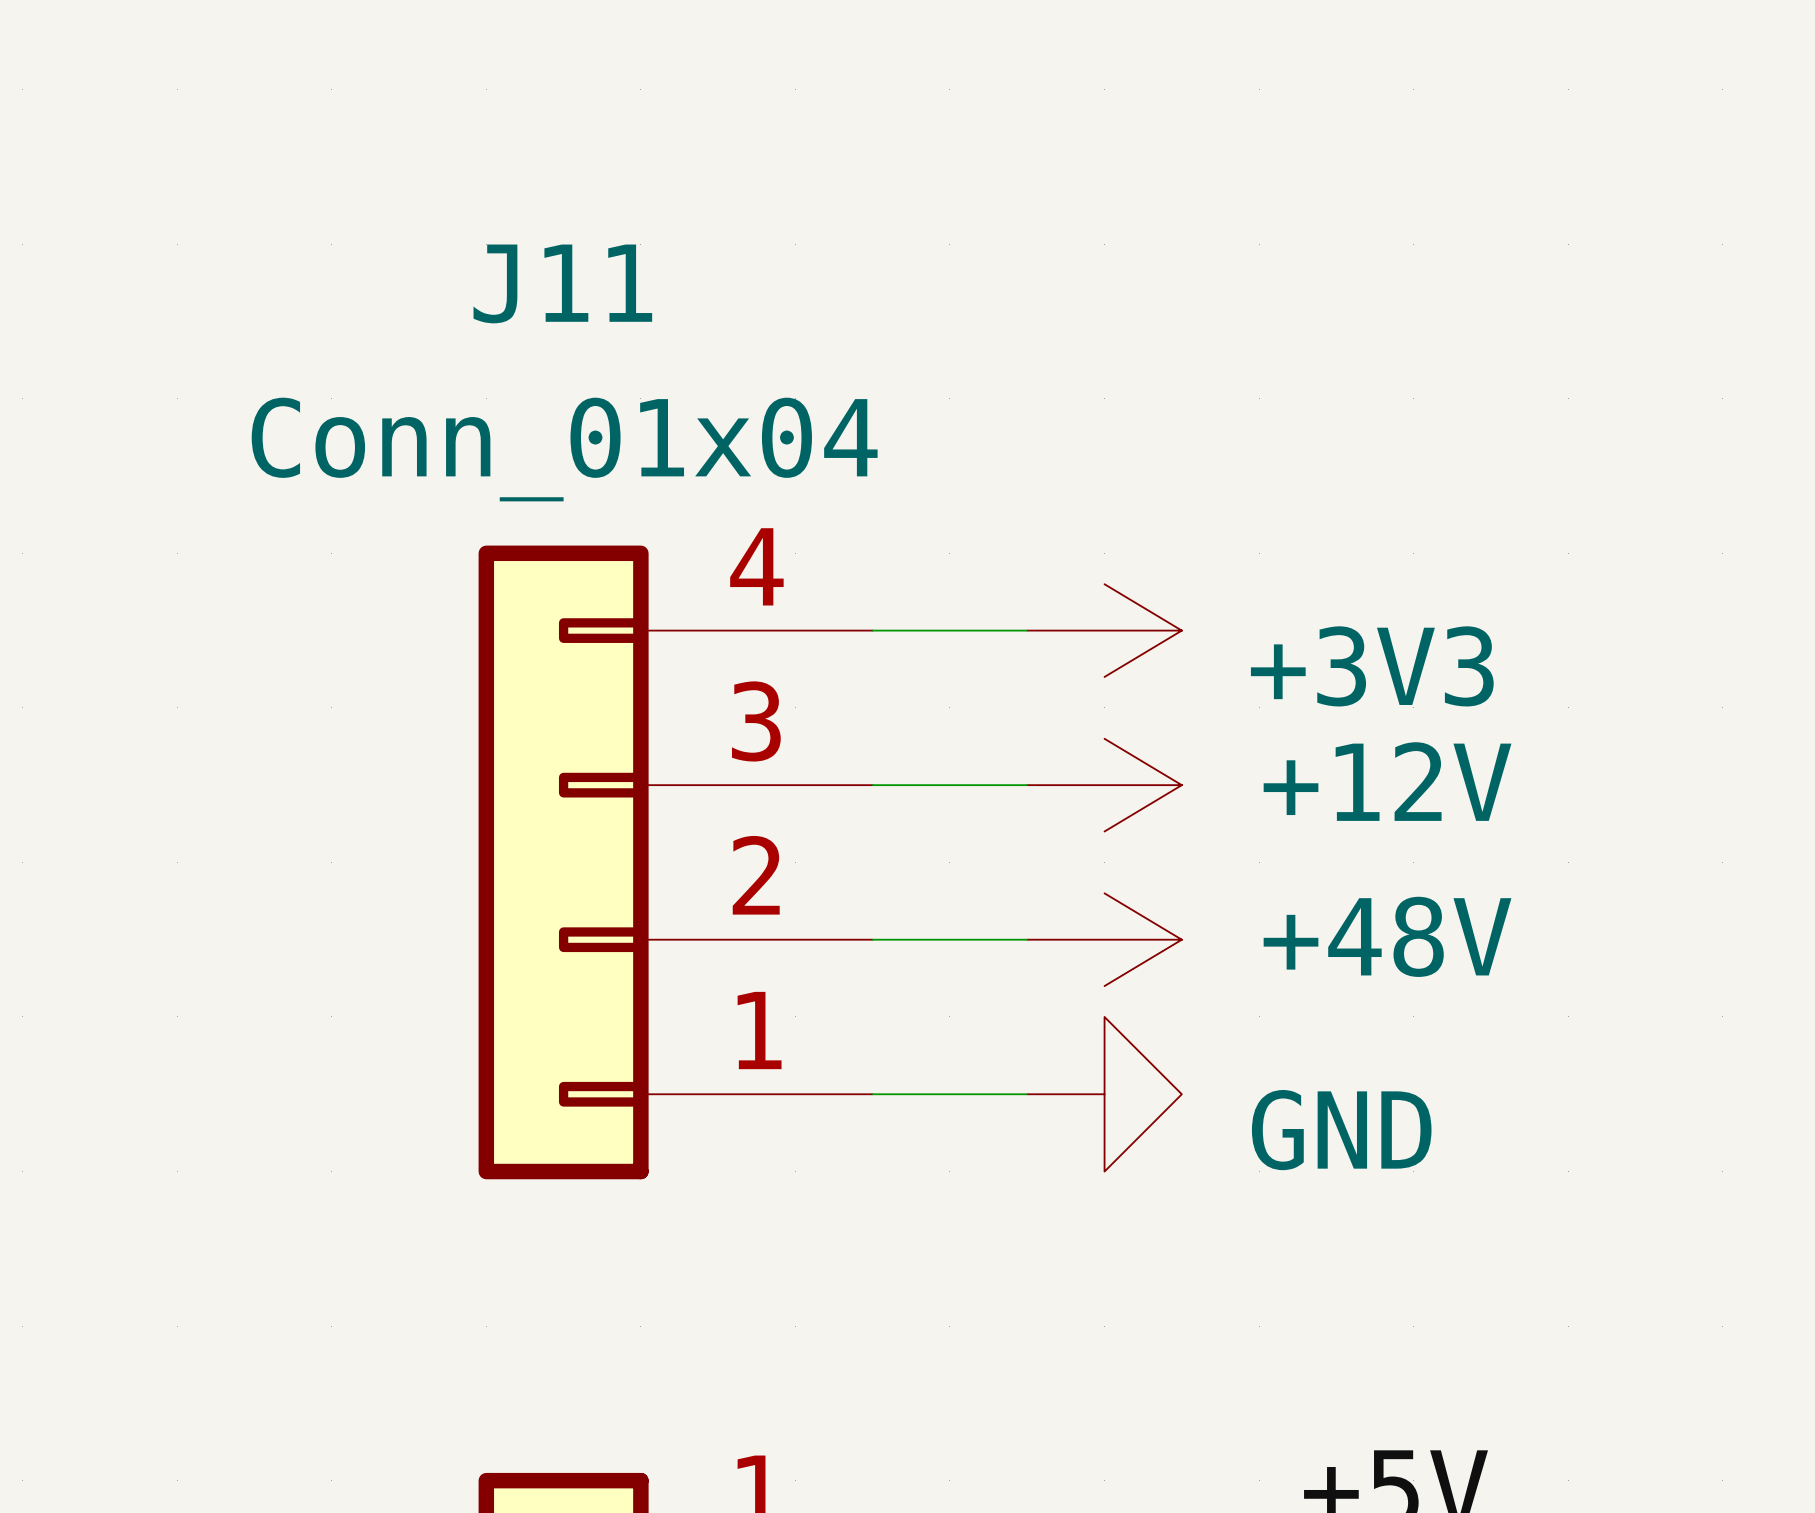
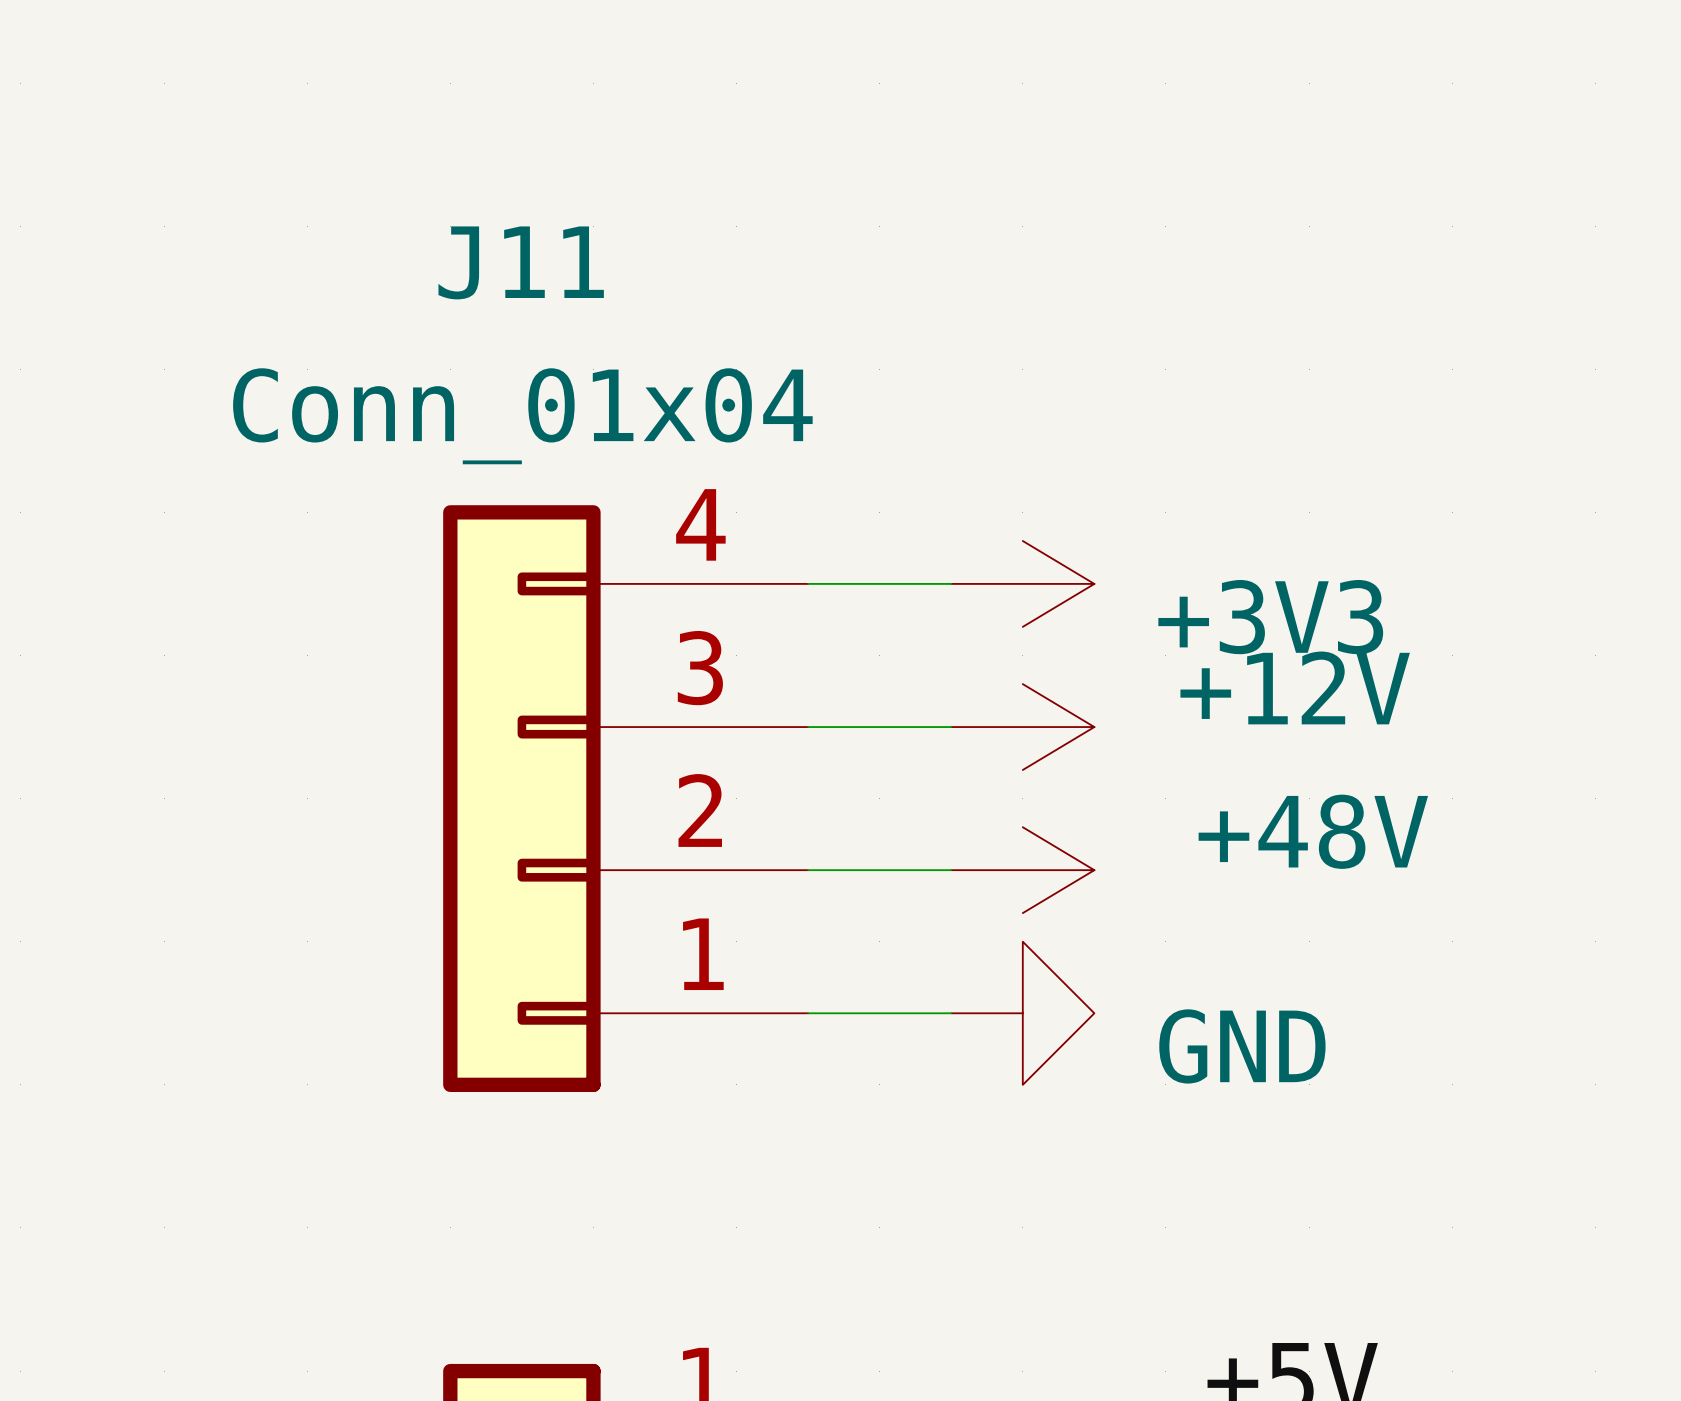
power symbol text position: +12V (1387, 781) -> +12V (1295, 687)
power symbol text position: +48V (1387, 936) -> +48V (1313, 831)

